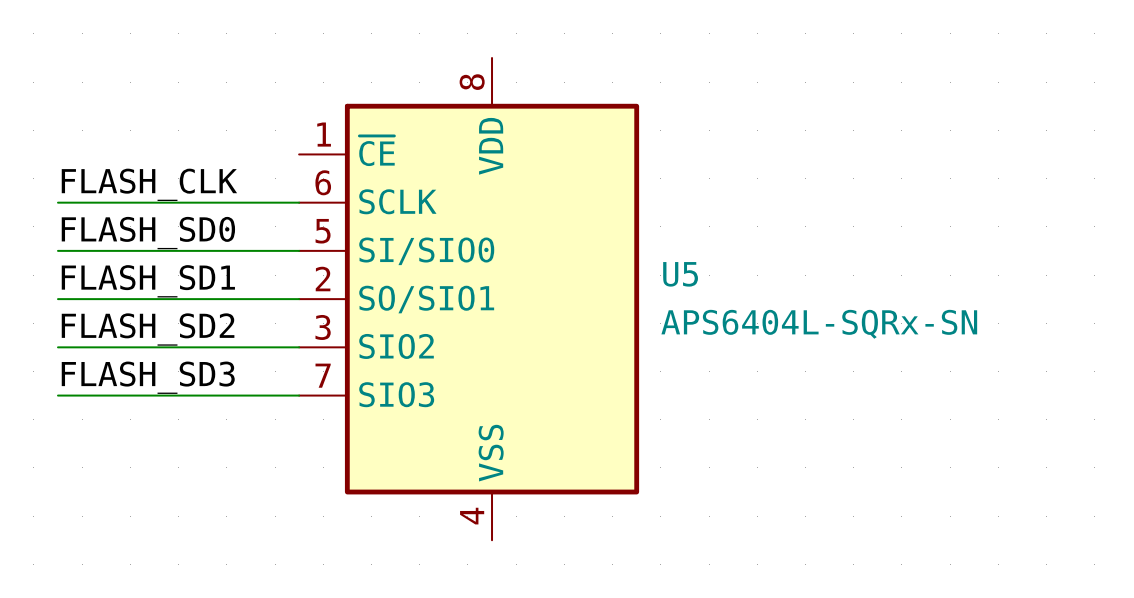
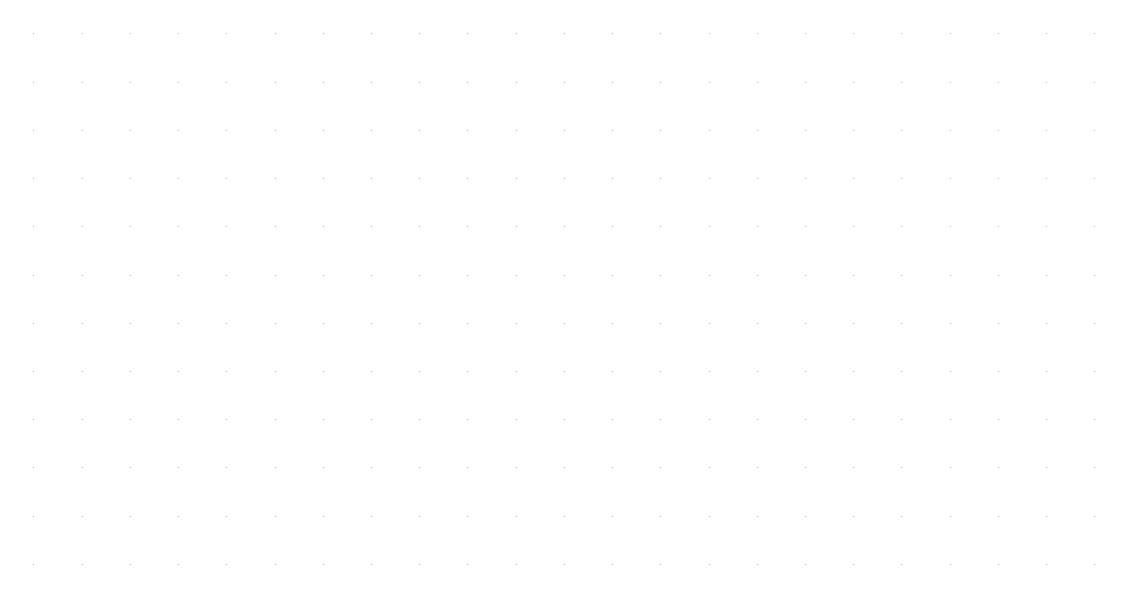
label: FLASH_CLK (149, 184) -> none
wire: (57, 202) (299, 202) -> none
label: FLASH_SD0 (148, 233) -> none
wire: (57, 250) (299, 250) -> none
label: FLASH_SD1 (148, 281) -> none
wire: (57, 299) (299, 299) -> none
U5: APS6404L-SQRx-SN (469, 299) -> none
label: FLASH_SD2 (148, 329) -> none
wire: (57, 347) (299, 347) -> none
label: FLASH_SD3 (148, 377) -> none
wire: (57, 395) (299, 395) -> none

